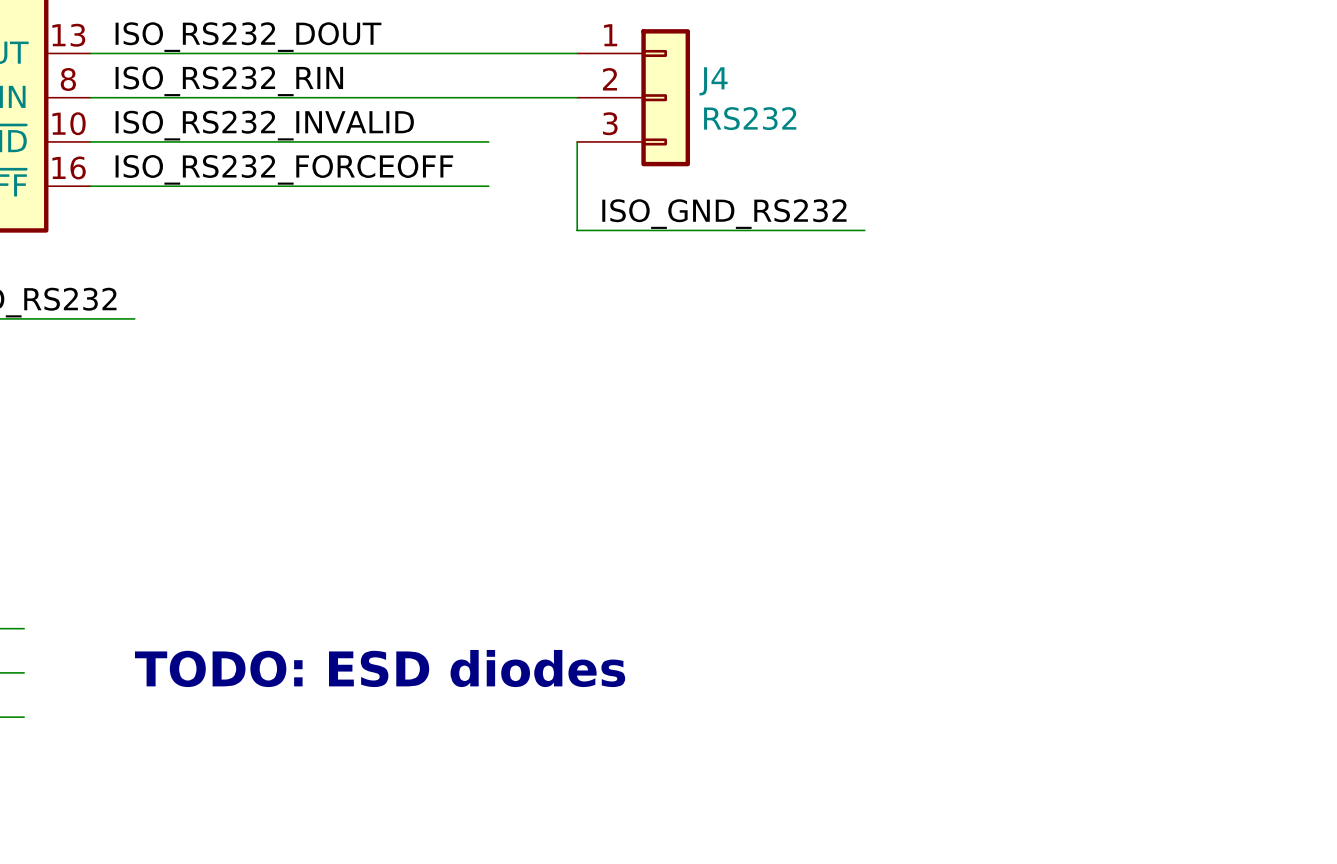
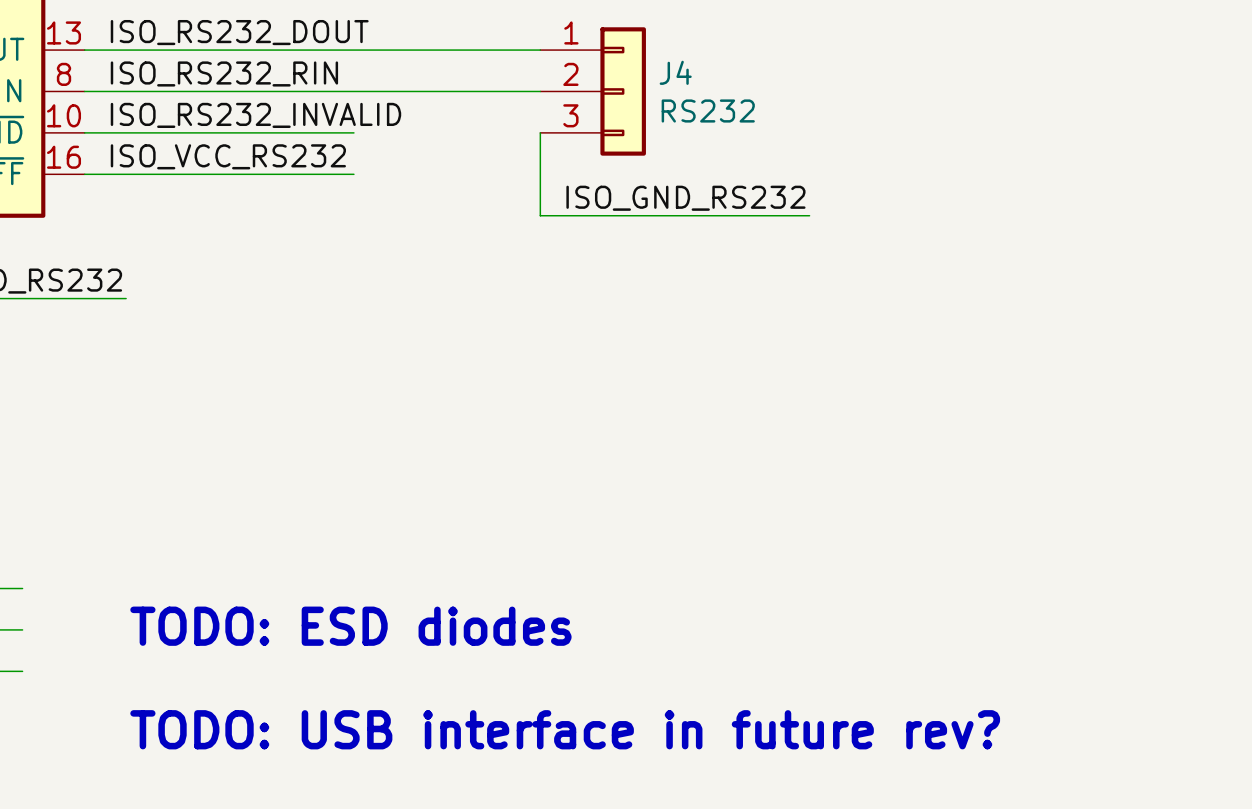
wire: (378, 141) (488, 141) -> none
label: ISO_RS232_FORCEOFF (284, 169) -> ISO_VCC_RS232 (228, 156)
wire: (378, 186) (488, 186) -> none
text: none -> TODO: USB interface in future rev? (565, 729)

